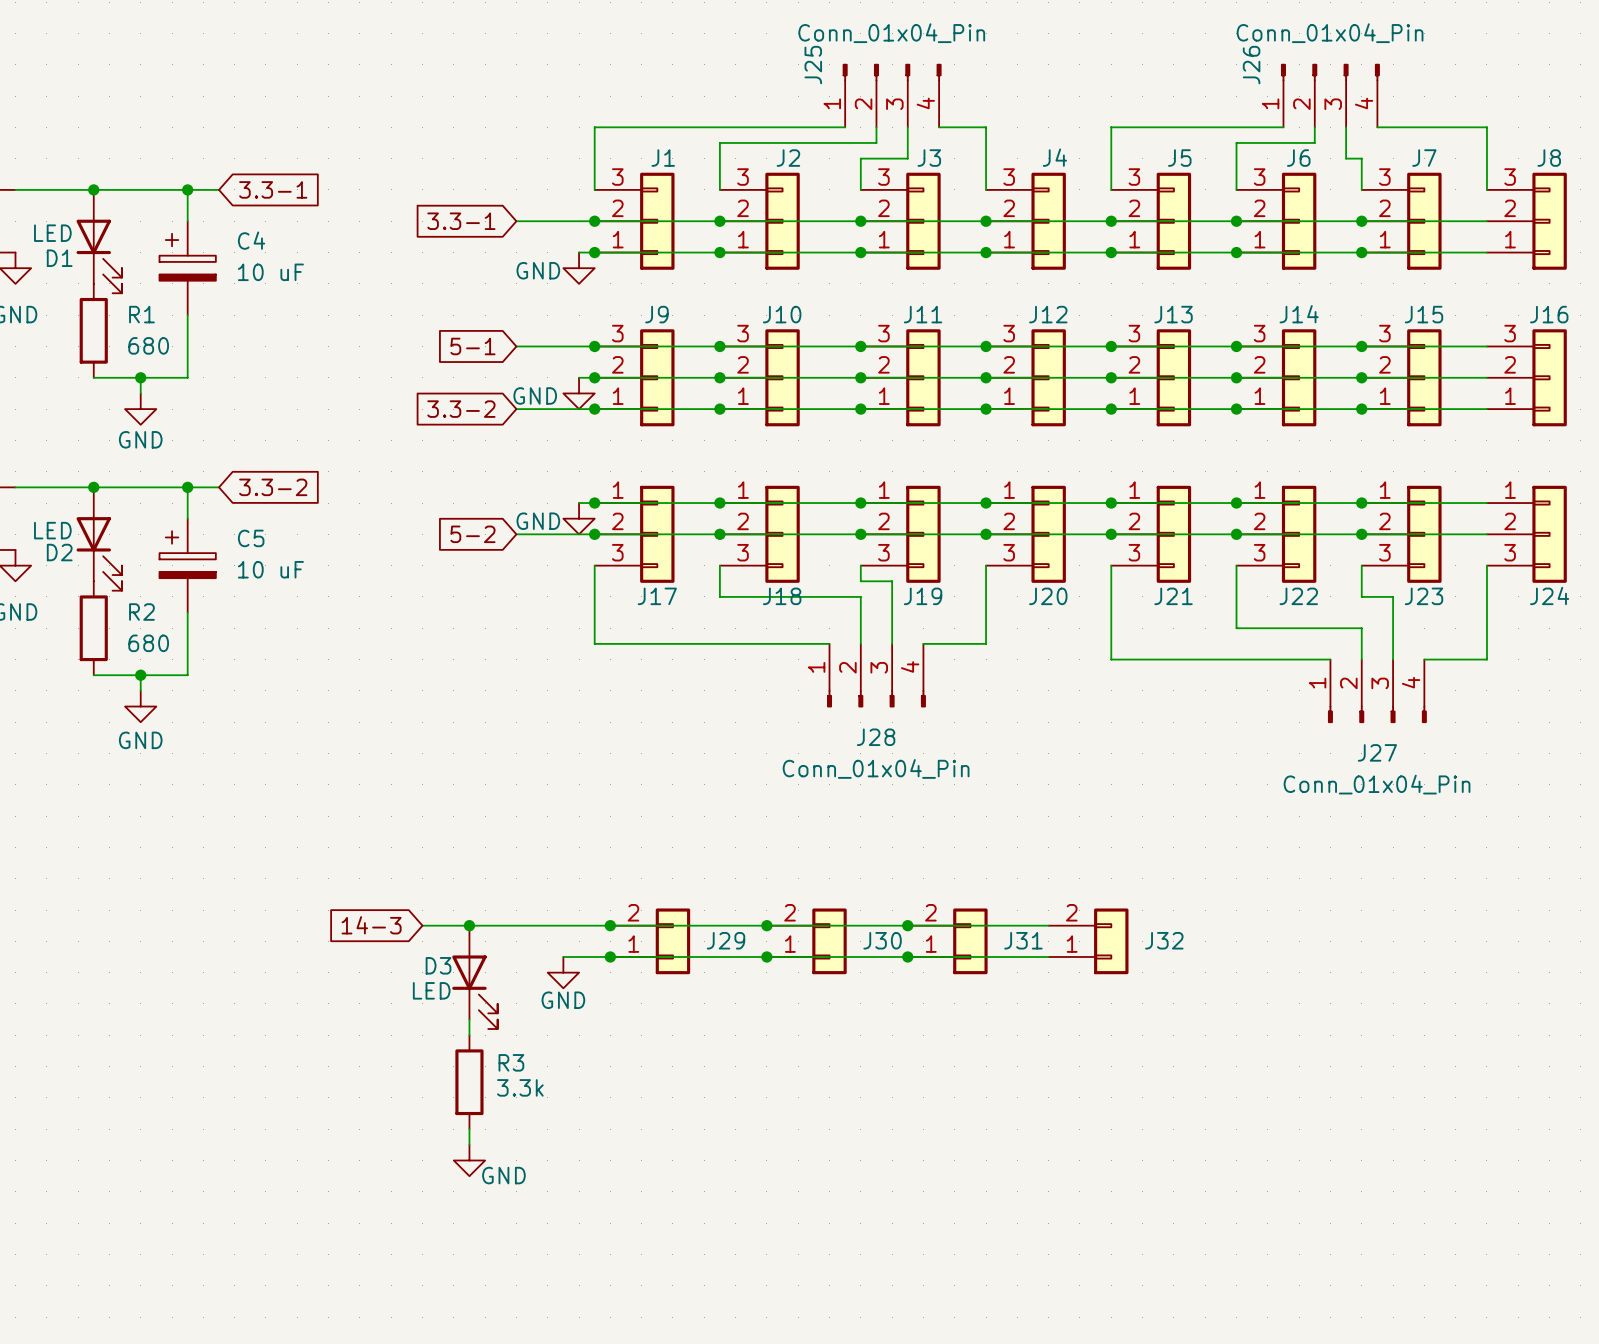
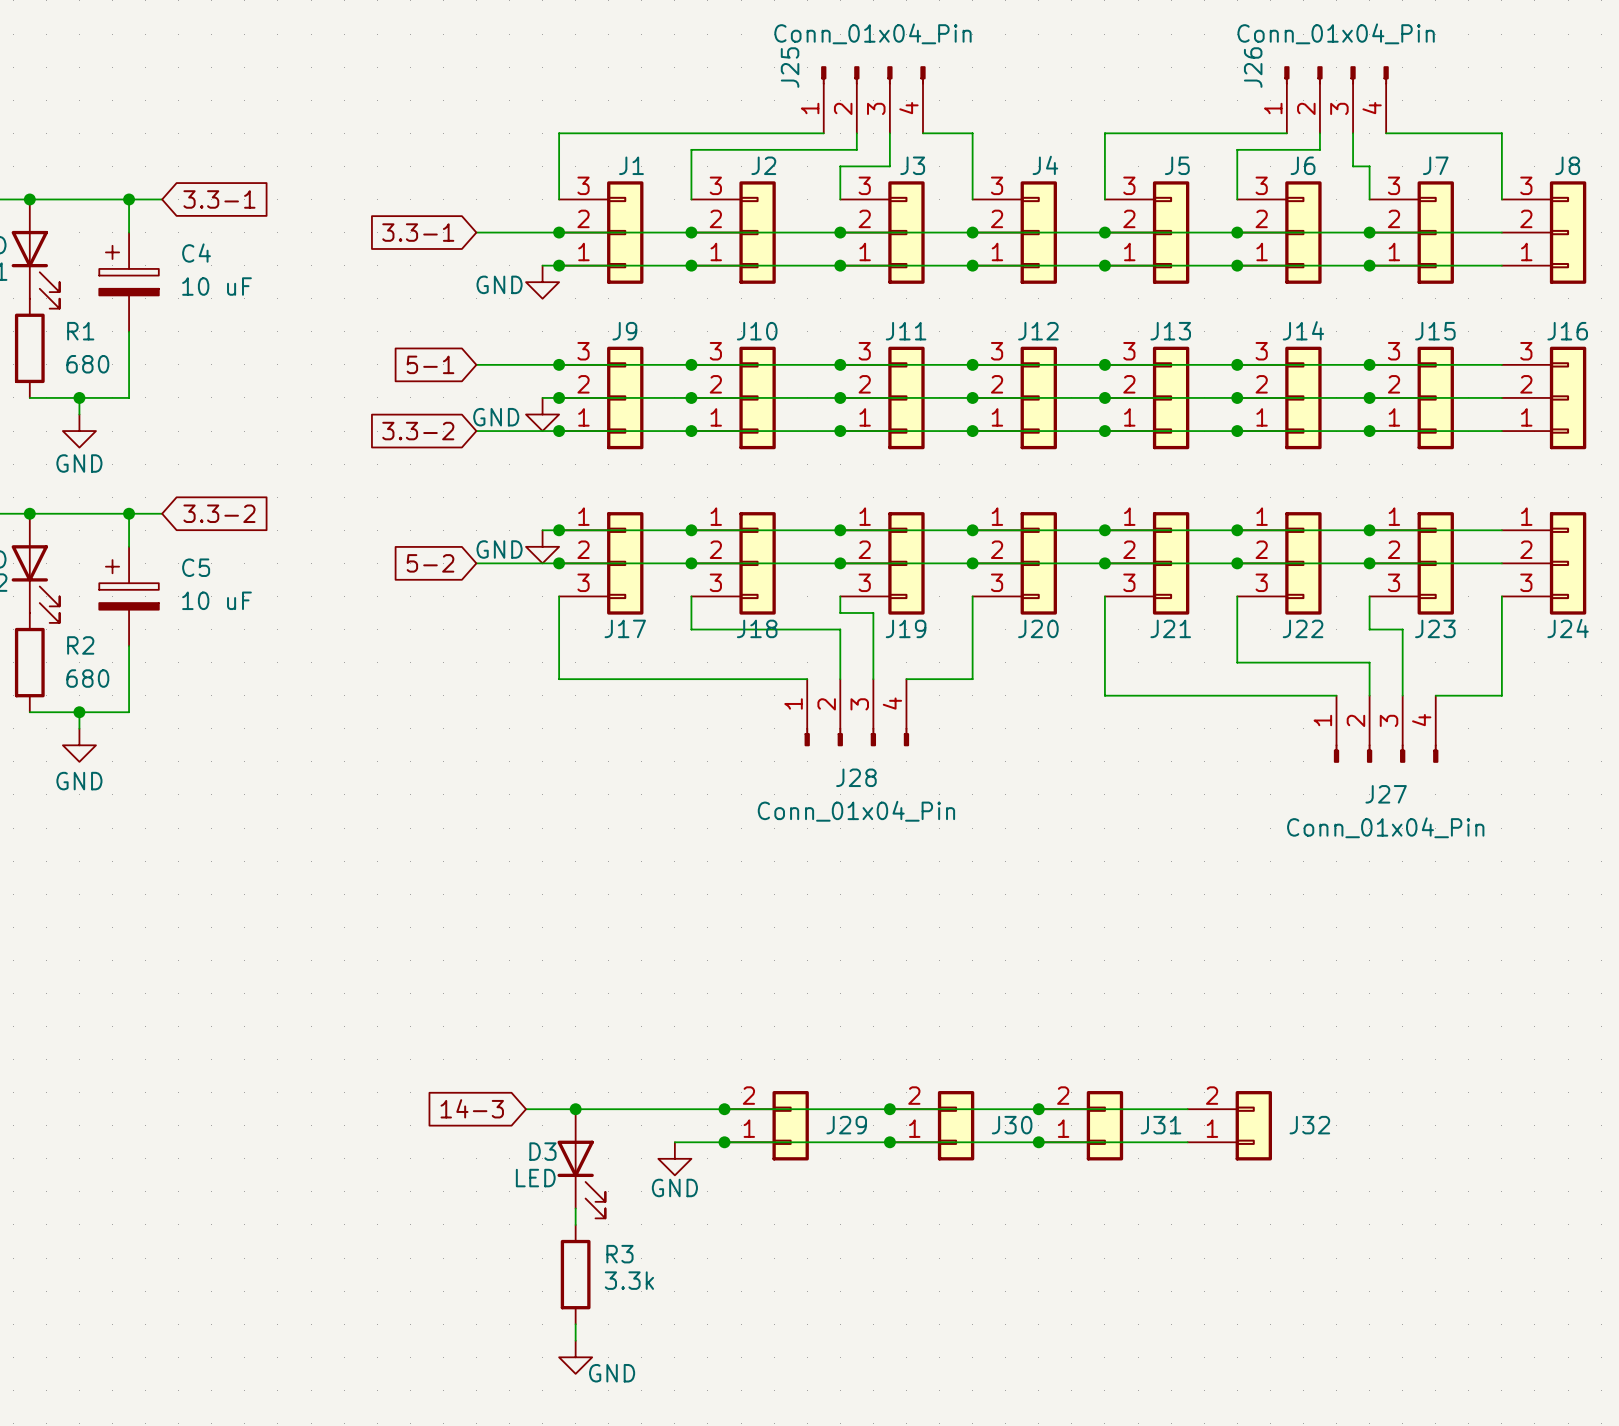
global label position: 14-3 (371, 925) -> 14-3 (472, 1108)
wire: (422, 925) (1048, 925) -> (526, 1109) (1187, 1109)
junction: (469, 925) -> none
junction: (610, 925) -> none
junction: (766, 925) -> none
junction: (907, 925) -> none
J29 position: (650, 941) -> (766, 1125)
J30 position: (806, 941) -> (932, 1125)
J31 position: (947, 941) -> (1080, 1125)
J32 position: (1088, 941) -> (1229, 1125)
wire: (563, 956) (1048, 956) -> (674, 1142) (1187, 1142)
junction: (610, 956) -> none
junction: (766, 956) -> none
junction: (907, 956) -> none
power symbol: GND (563, 972) -> none
D3 position: (474, 977) -> (581, 1163)
wire: (469, 1019) (469, 1035) -> (575, 1208) (575, 1224)
junction: none -> (575, 1109)
junction: none -> (724, 1109)
junction: none -> (889, 1109)
junction: none -> (1038, 1109)
R3 position: (469, 1082) -> (575, 1274)
junction: none -> (724, 1142)
junction: none -> (889, 1142)
junction: none -> (1038, 1142)
power symbol: none -> GND (674, 1158)
wire: (469, 1129) (469, 1144) -> (575, 1324) (575, 1340)
power symbol: GND (469, 1160) -> none
power symbol: none -> GND (575, 1357)

